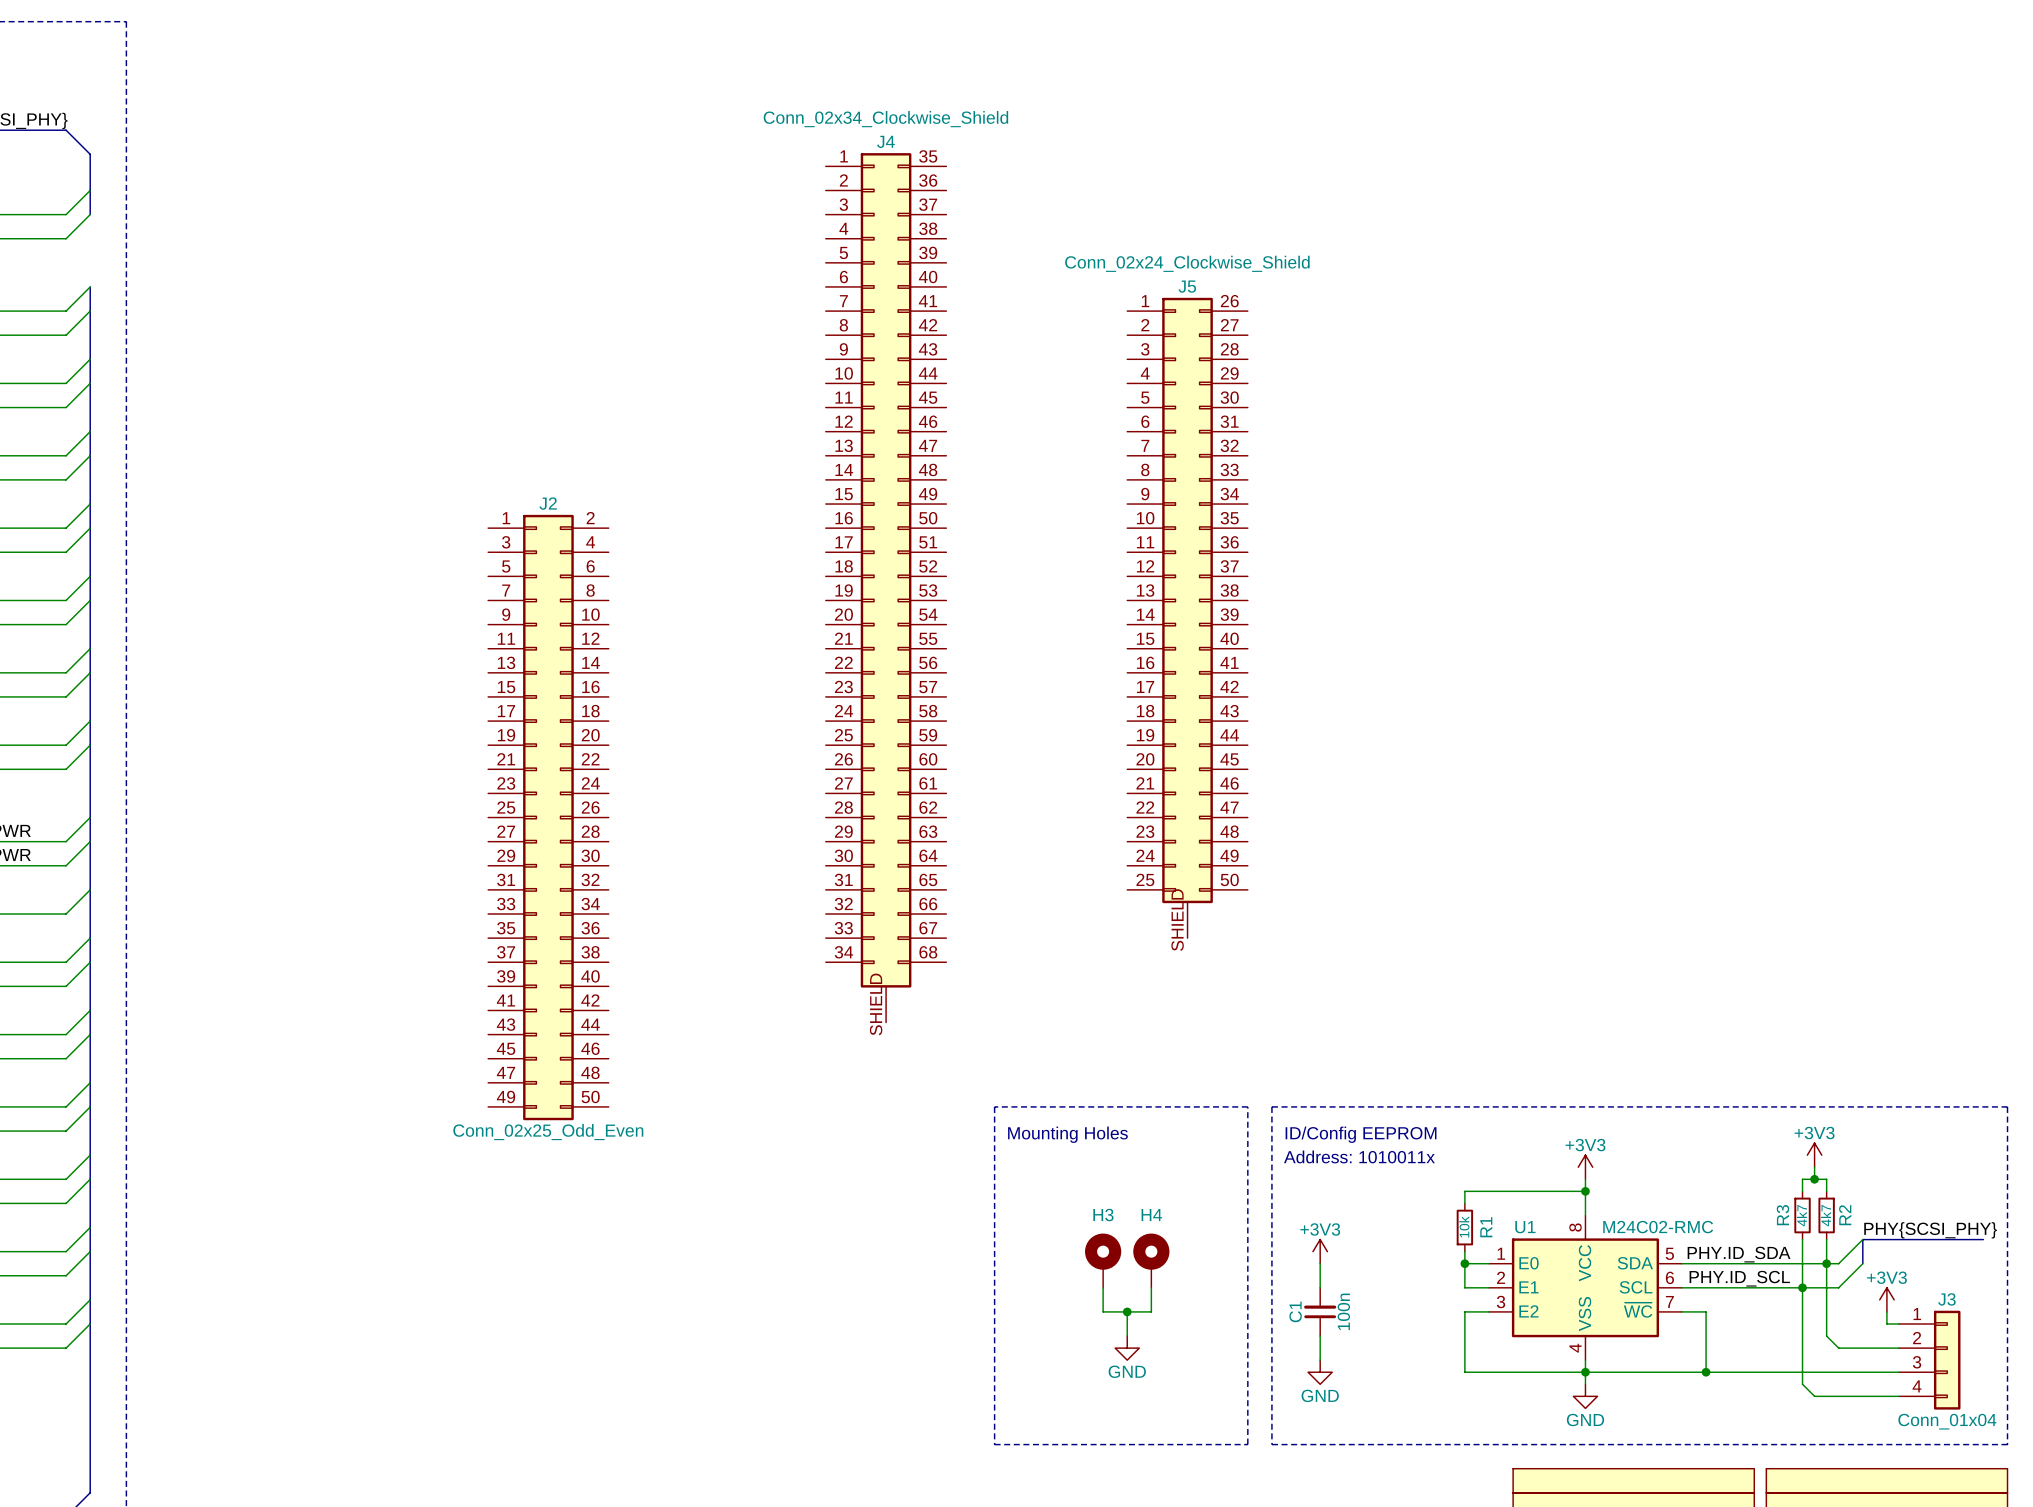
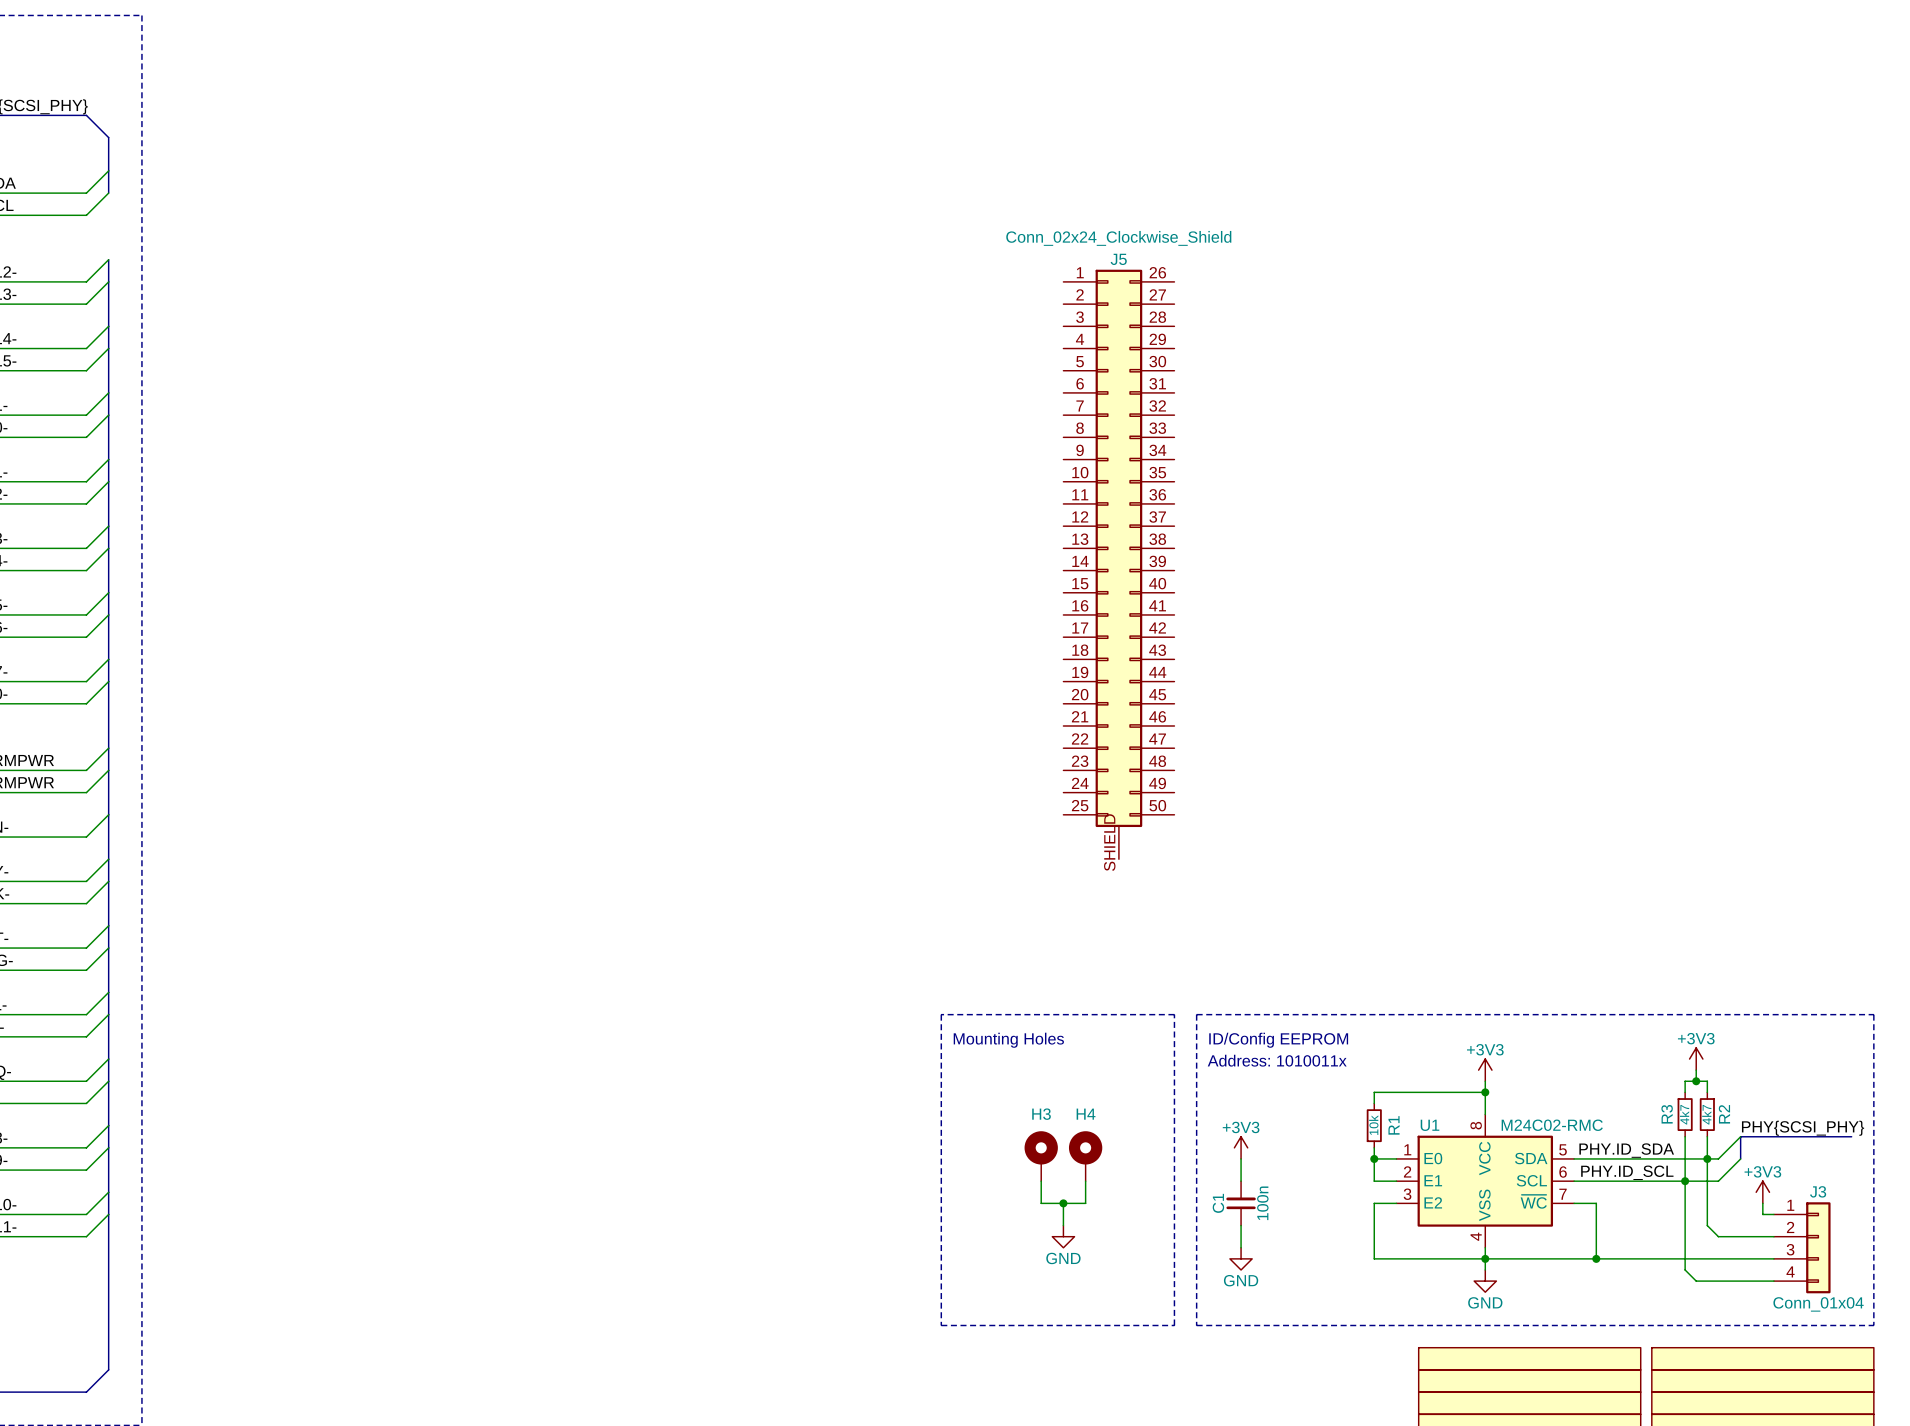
J4: Conn_02x34_Clockwise_Shield (886, 587) -> none
J2: Conn_02x25_Odd_Even (548, 817) -> none

